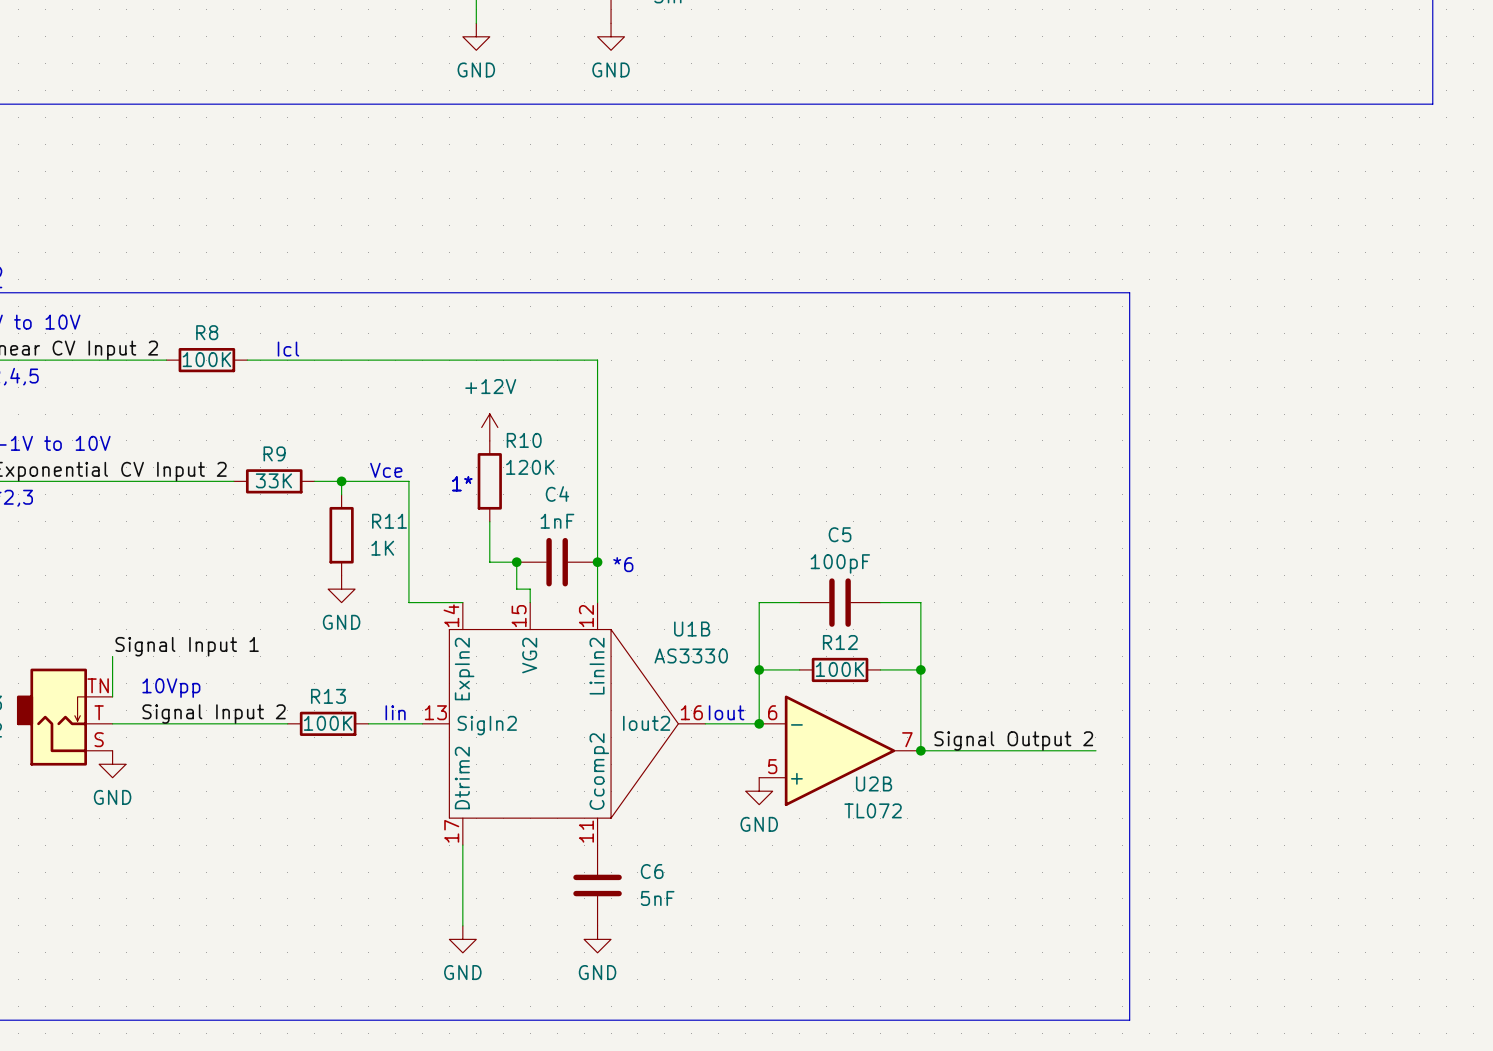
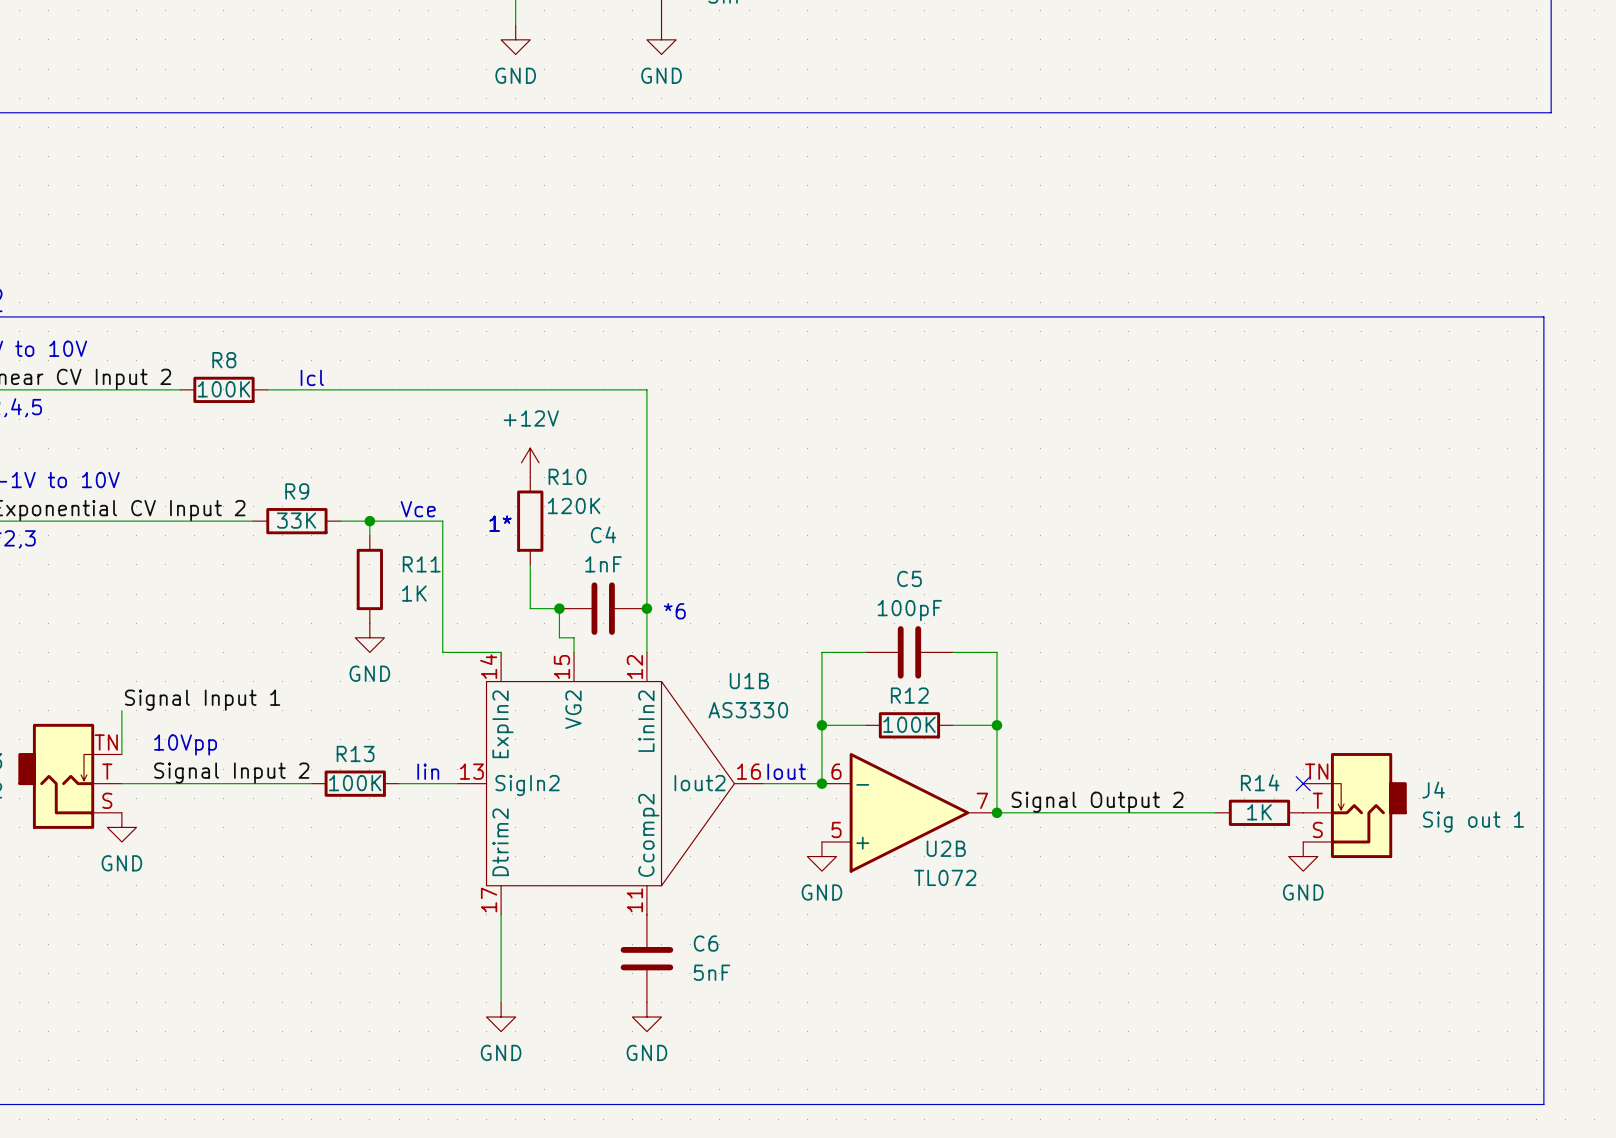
line: (1129, 292) (1129, 1020) -> (1223, 316) (1543, 316) (1543, 1104) (1223, 1104)
no-connect mark: none -> (1303, 783)
J4: none -> Sig out 1 (1355, 805)
wire: none -> (1186, 812) (1215, 812)
R14: none -> 1K (1259, 812)
power symbol: none -> GND (1303, 856)

